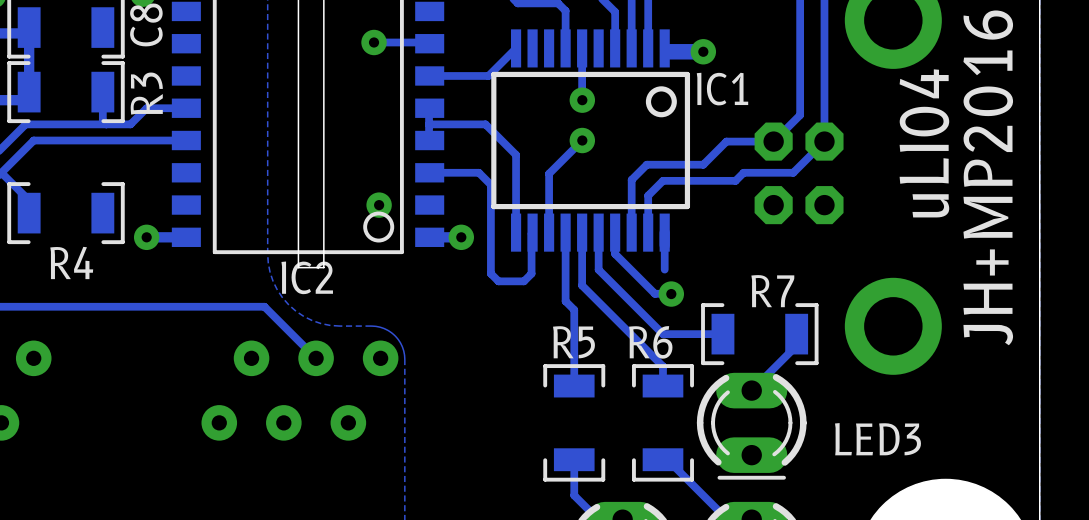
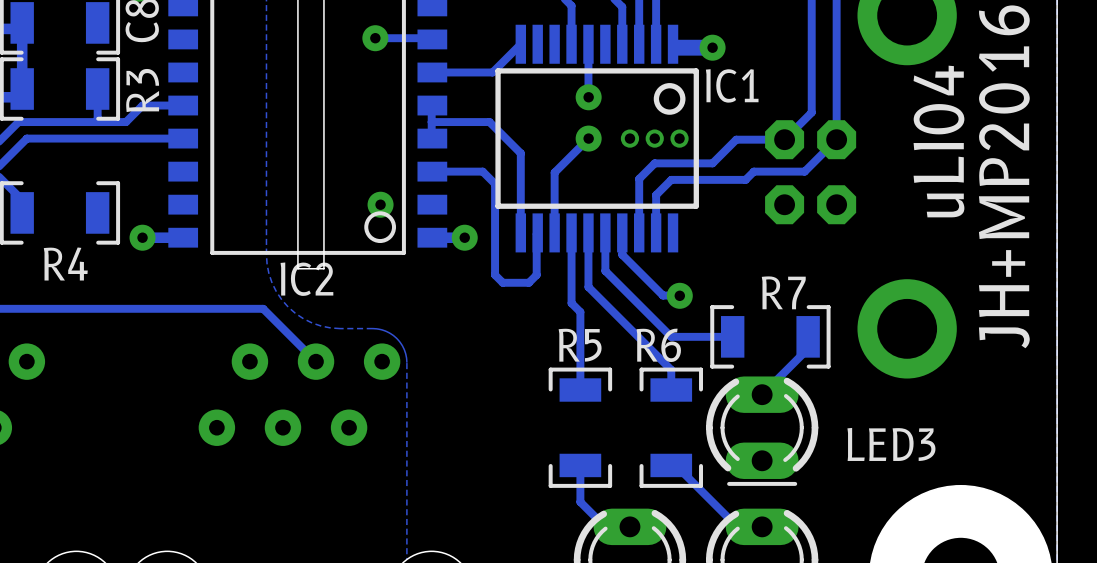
via: none -> (629, 138)
via: none -> (654, 138)
via: none -> (679, 138)
track: (664, 232) (664, 269) -> none

